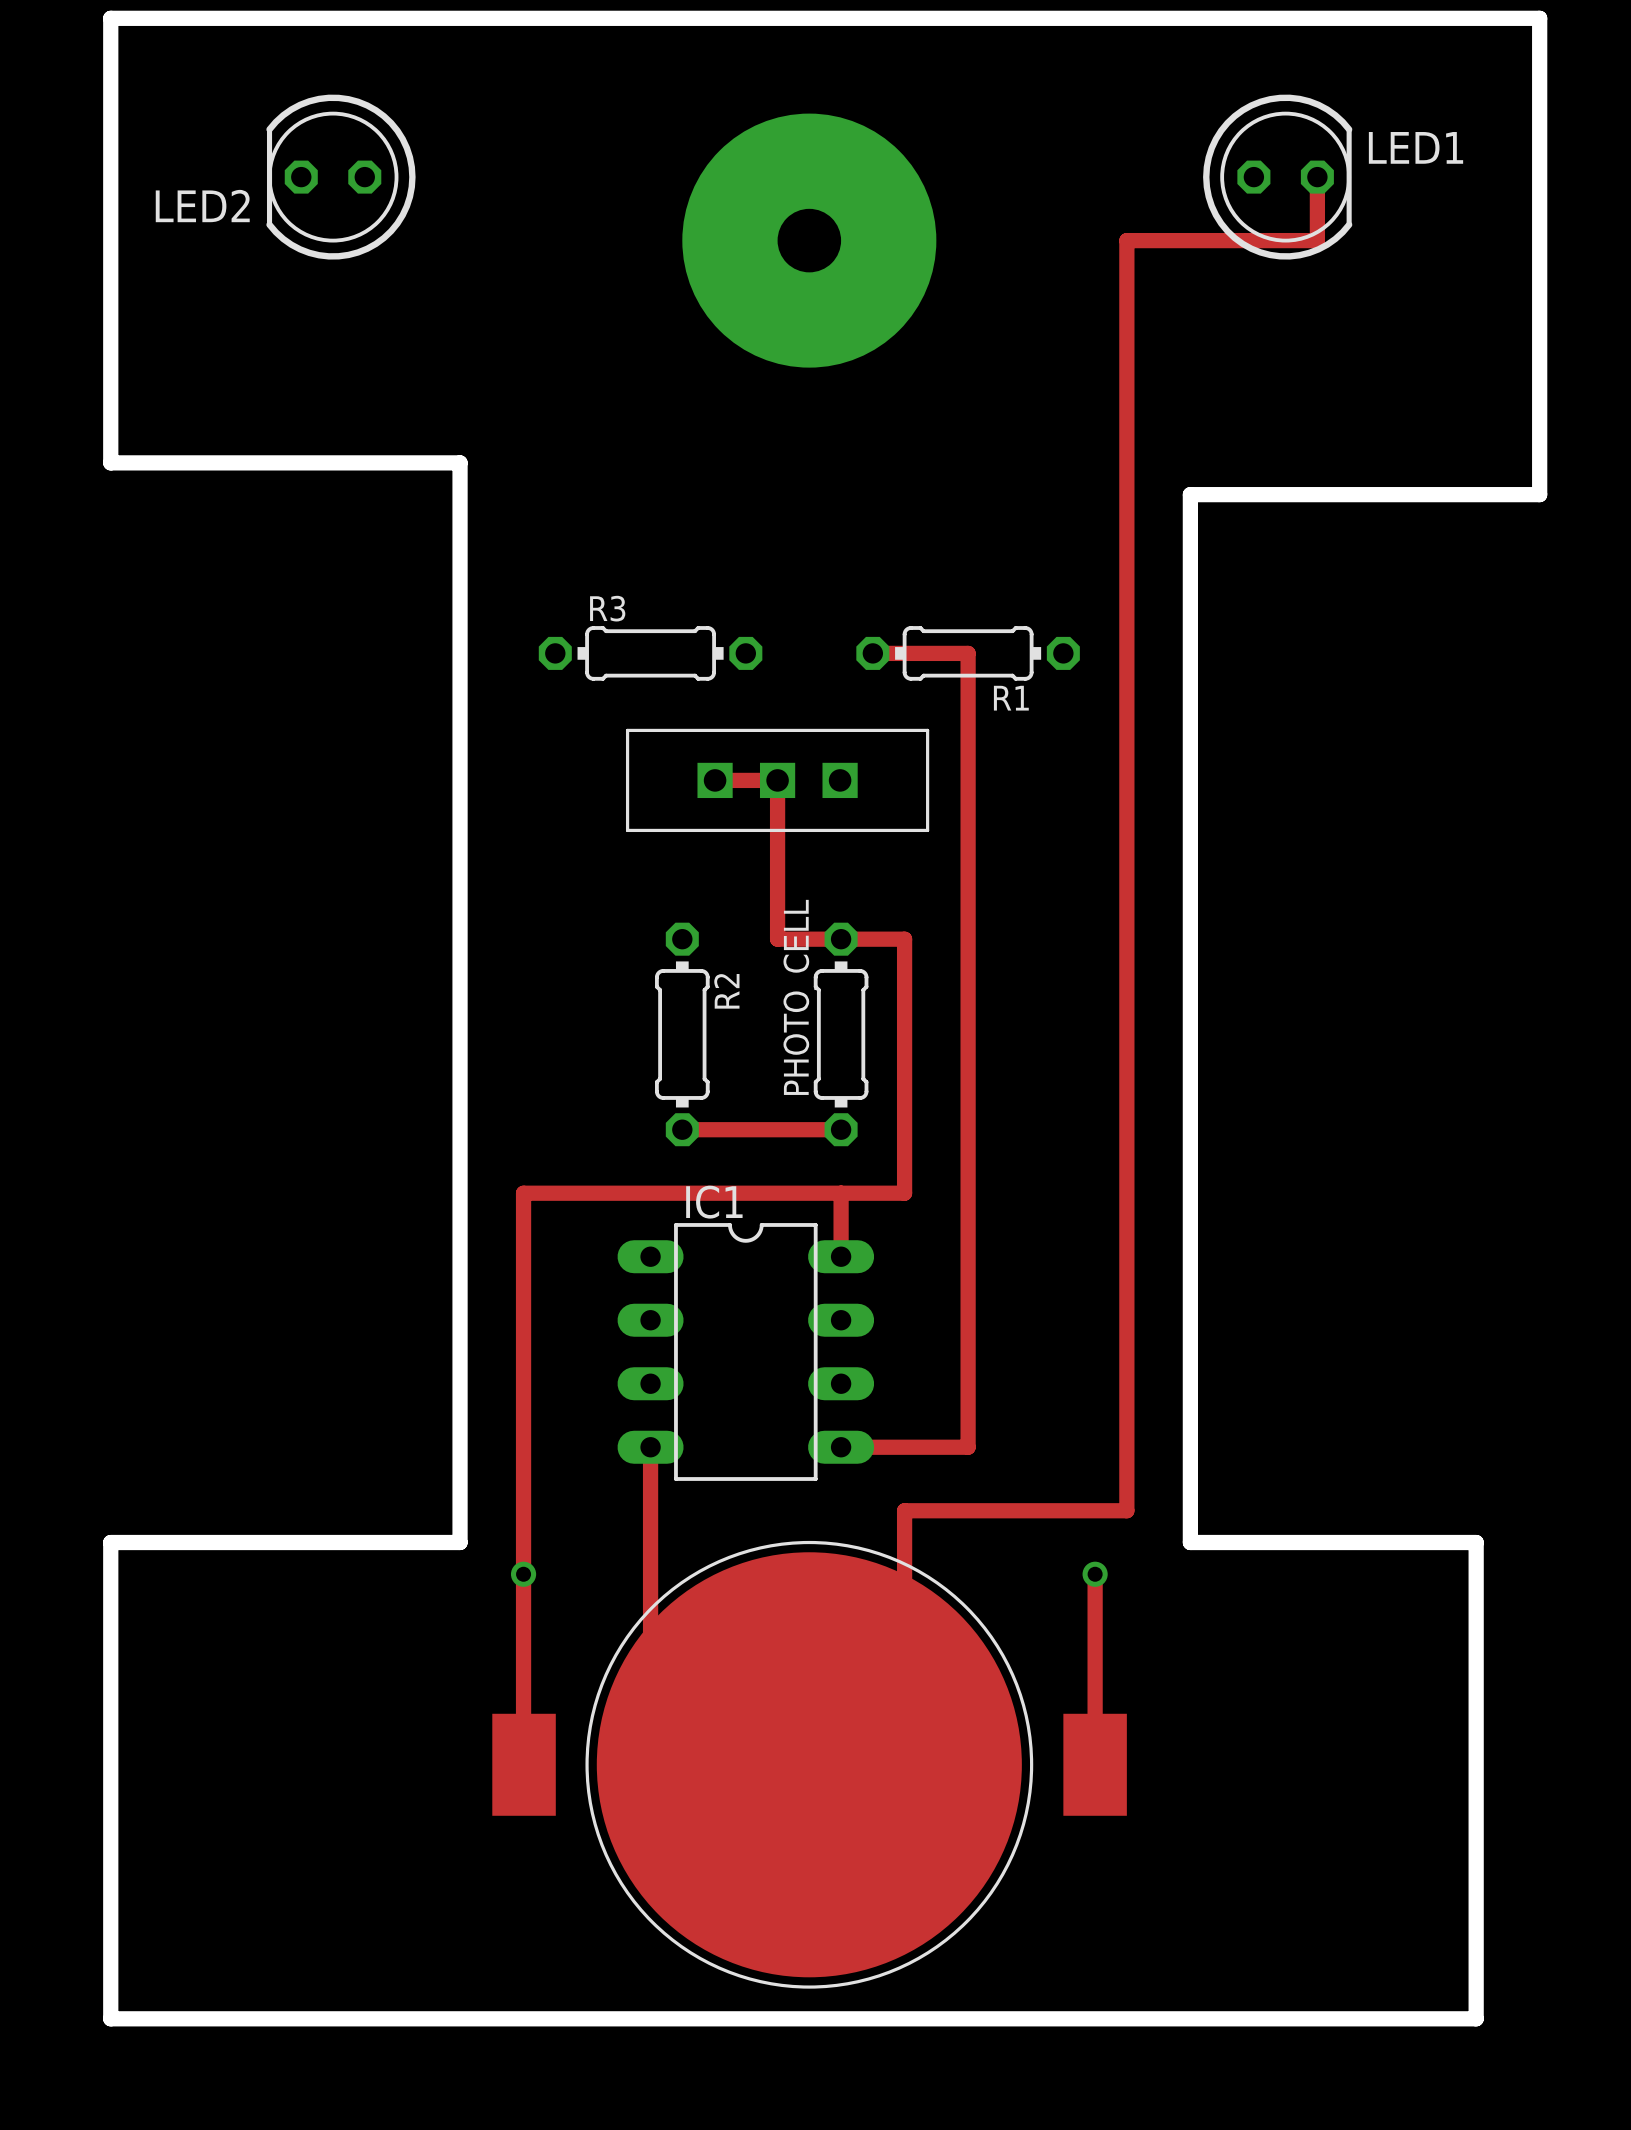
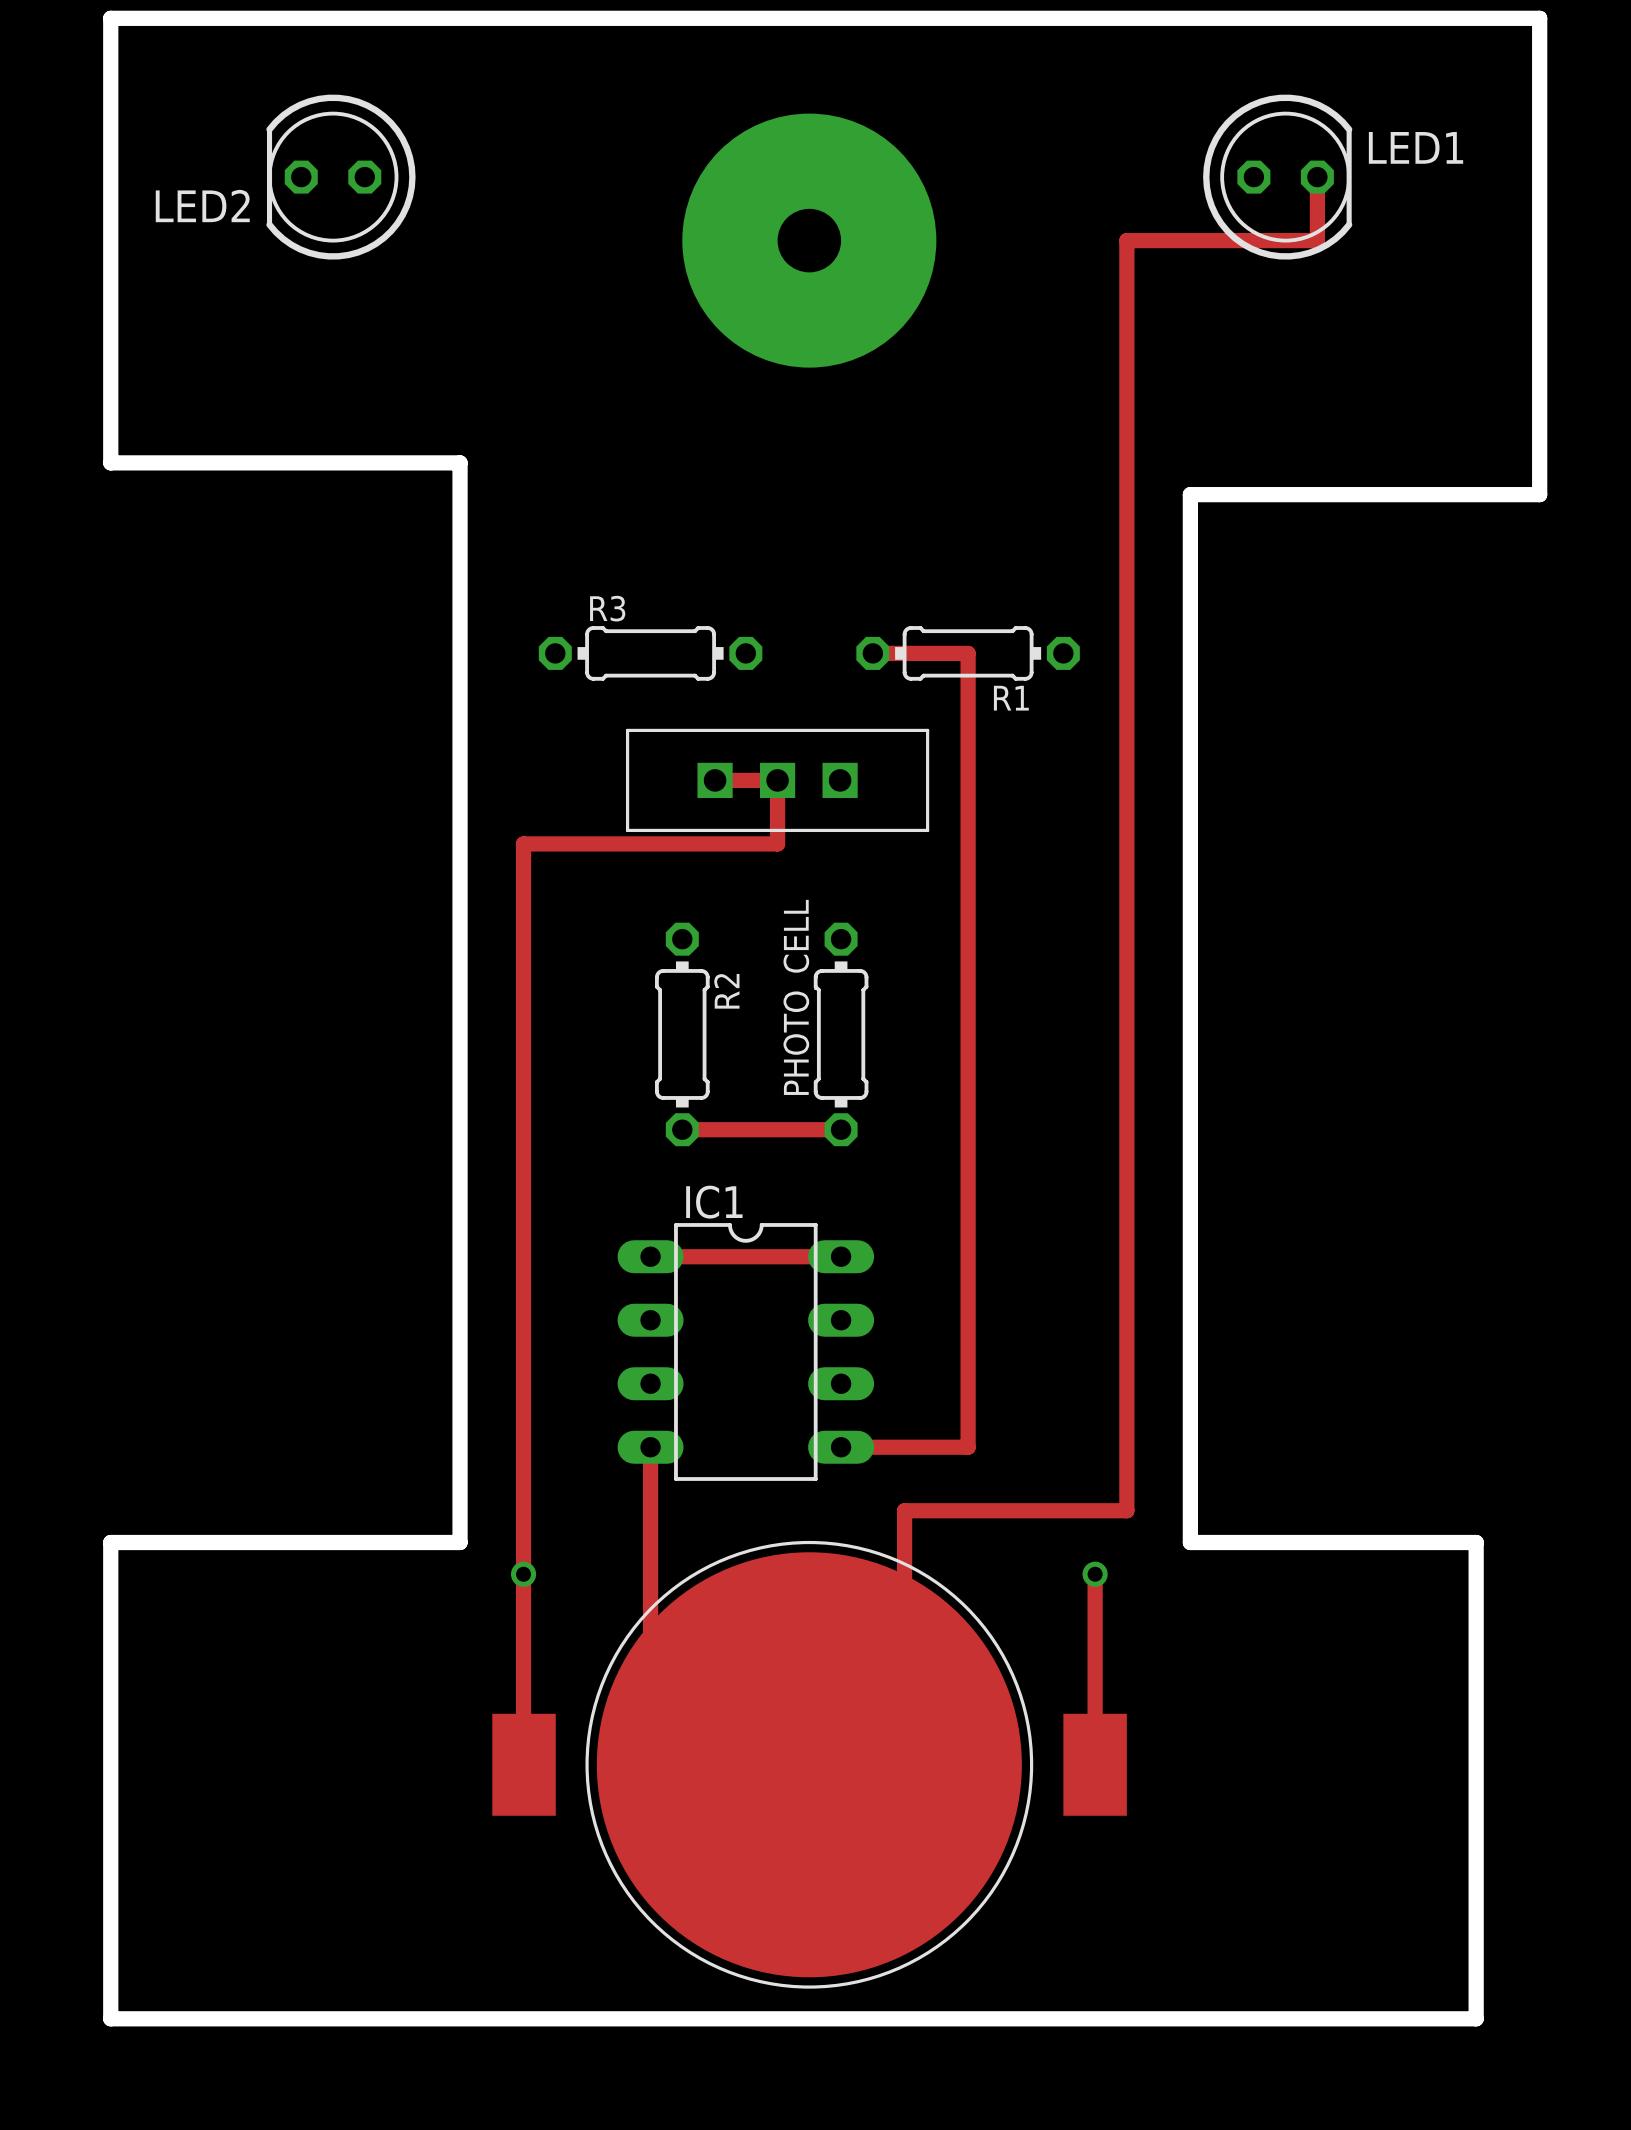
track: (777, 843) (777, 939) (904, 939) (904, 1193) (523, 1193) -> (777, 843) (523, 843) (523, 1193)
track: (841, 1193) (841, 1256) -> (650, 1256) (841, 1256)

